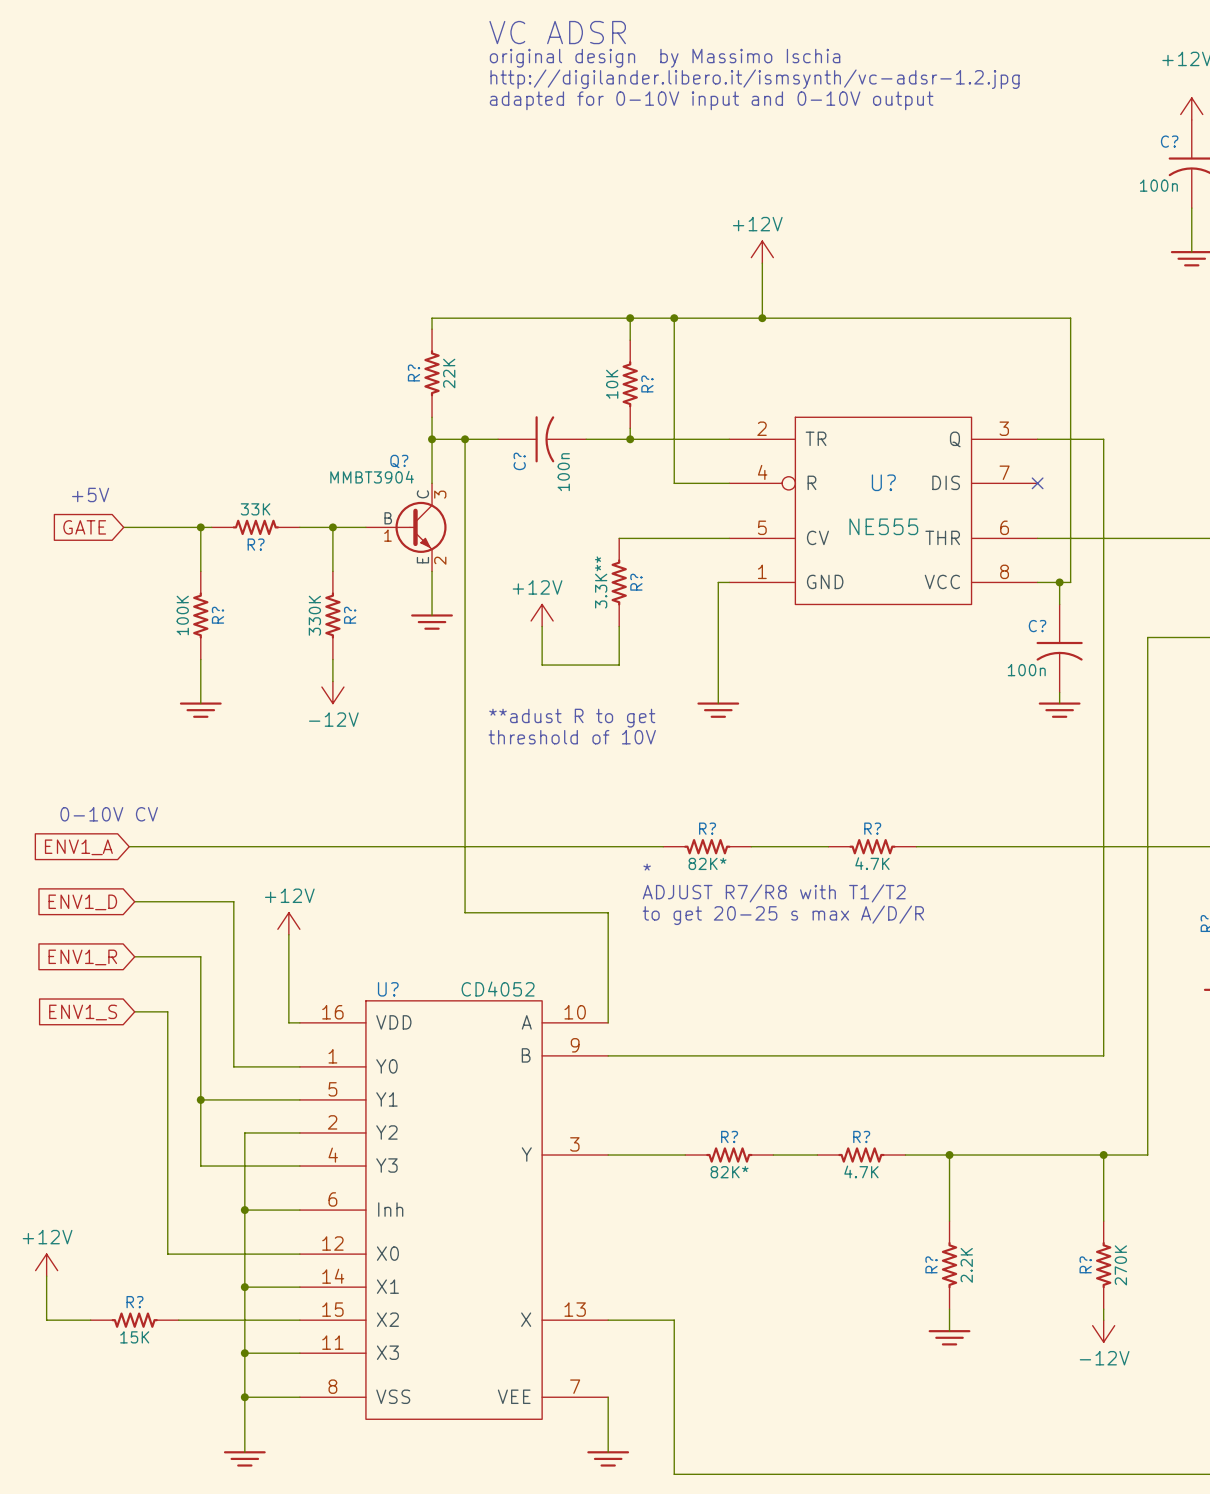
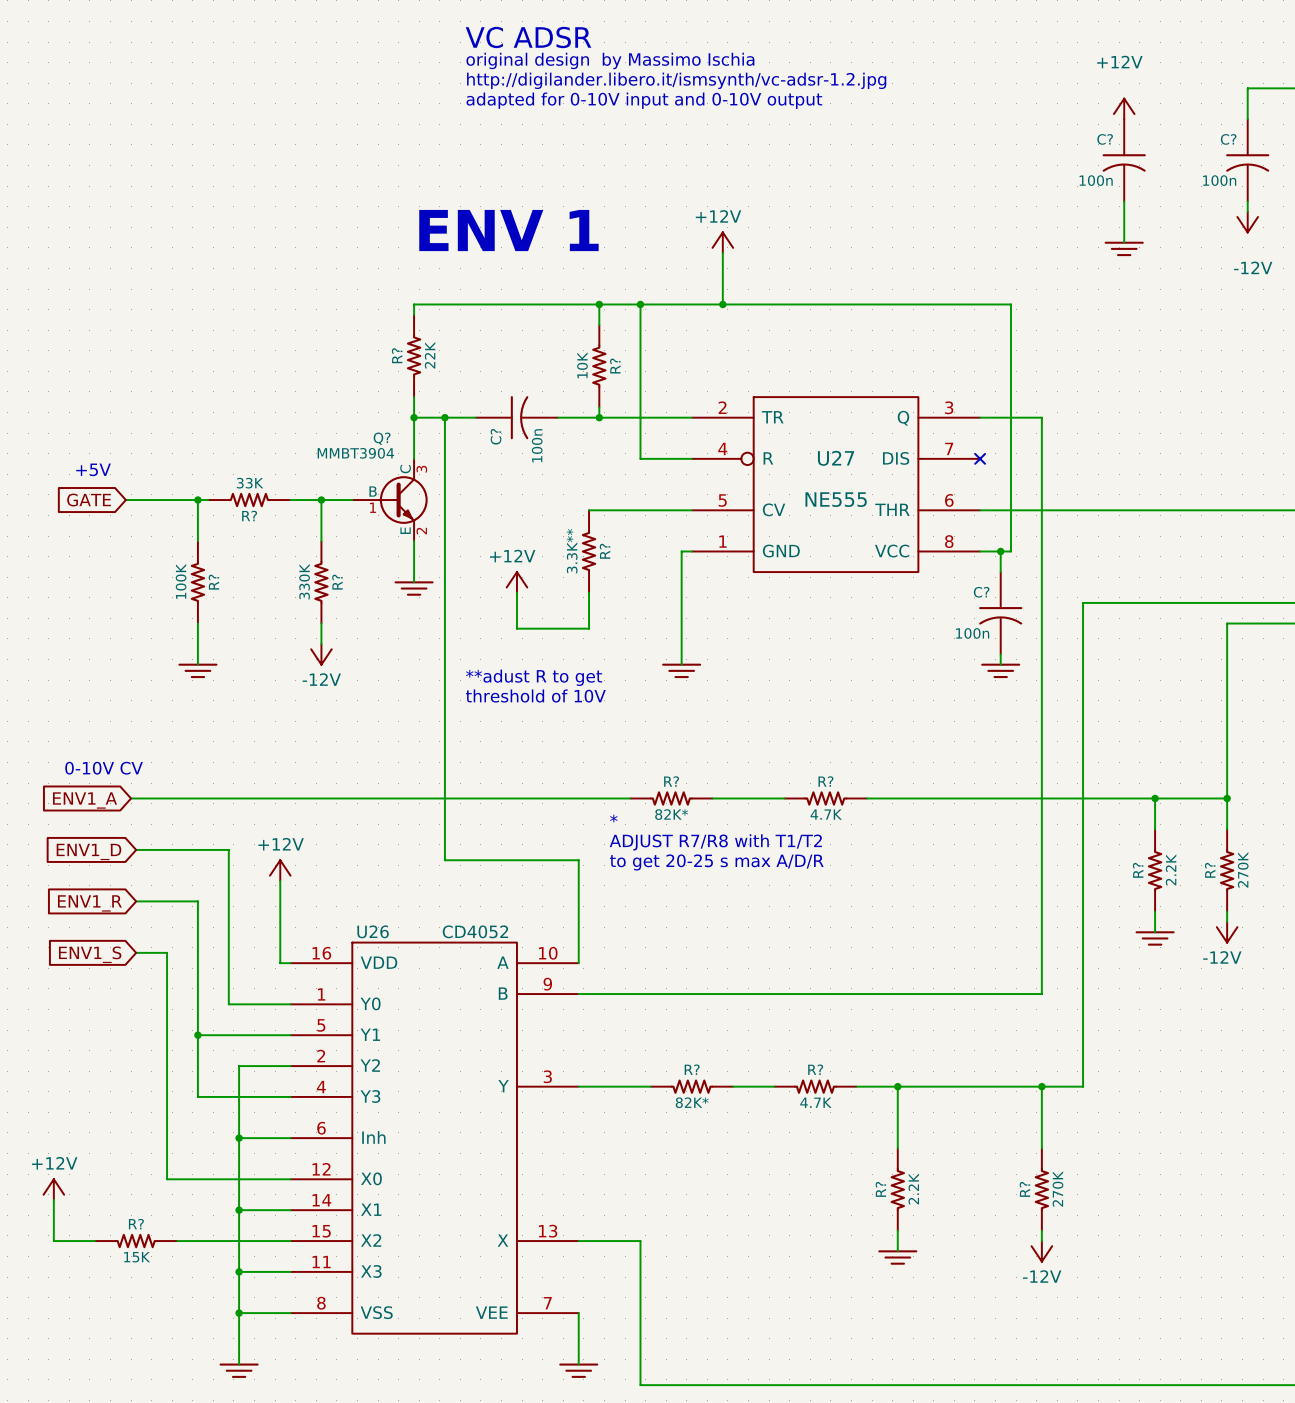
text: none -> ENV 1 (508, 230)
U? name: U? (883, 482) -> U27 (836, 458)
U? name: U? (388, 989) -> U26 (373, 931)

